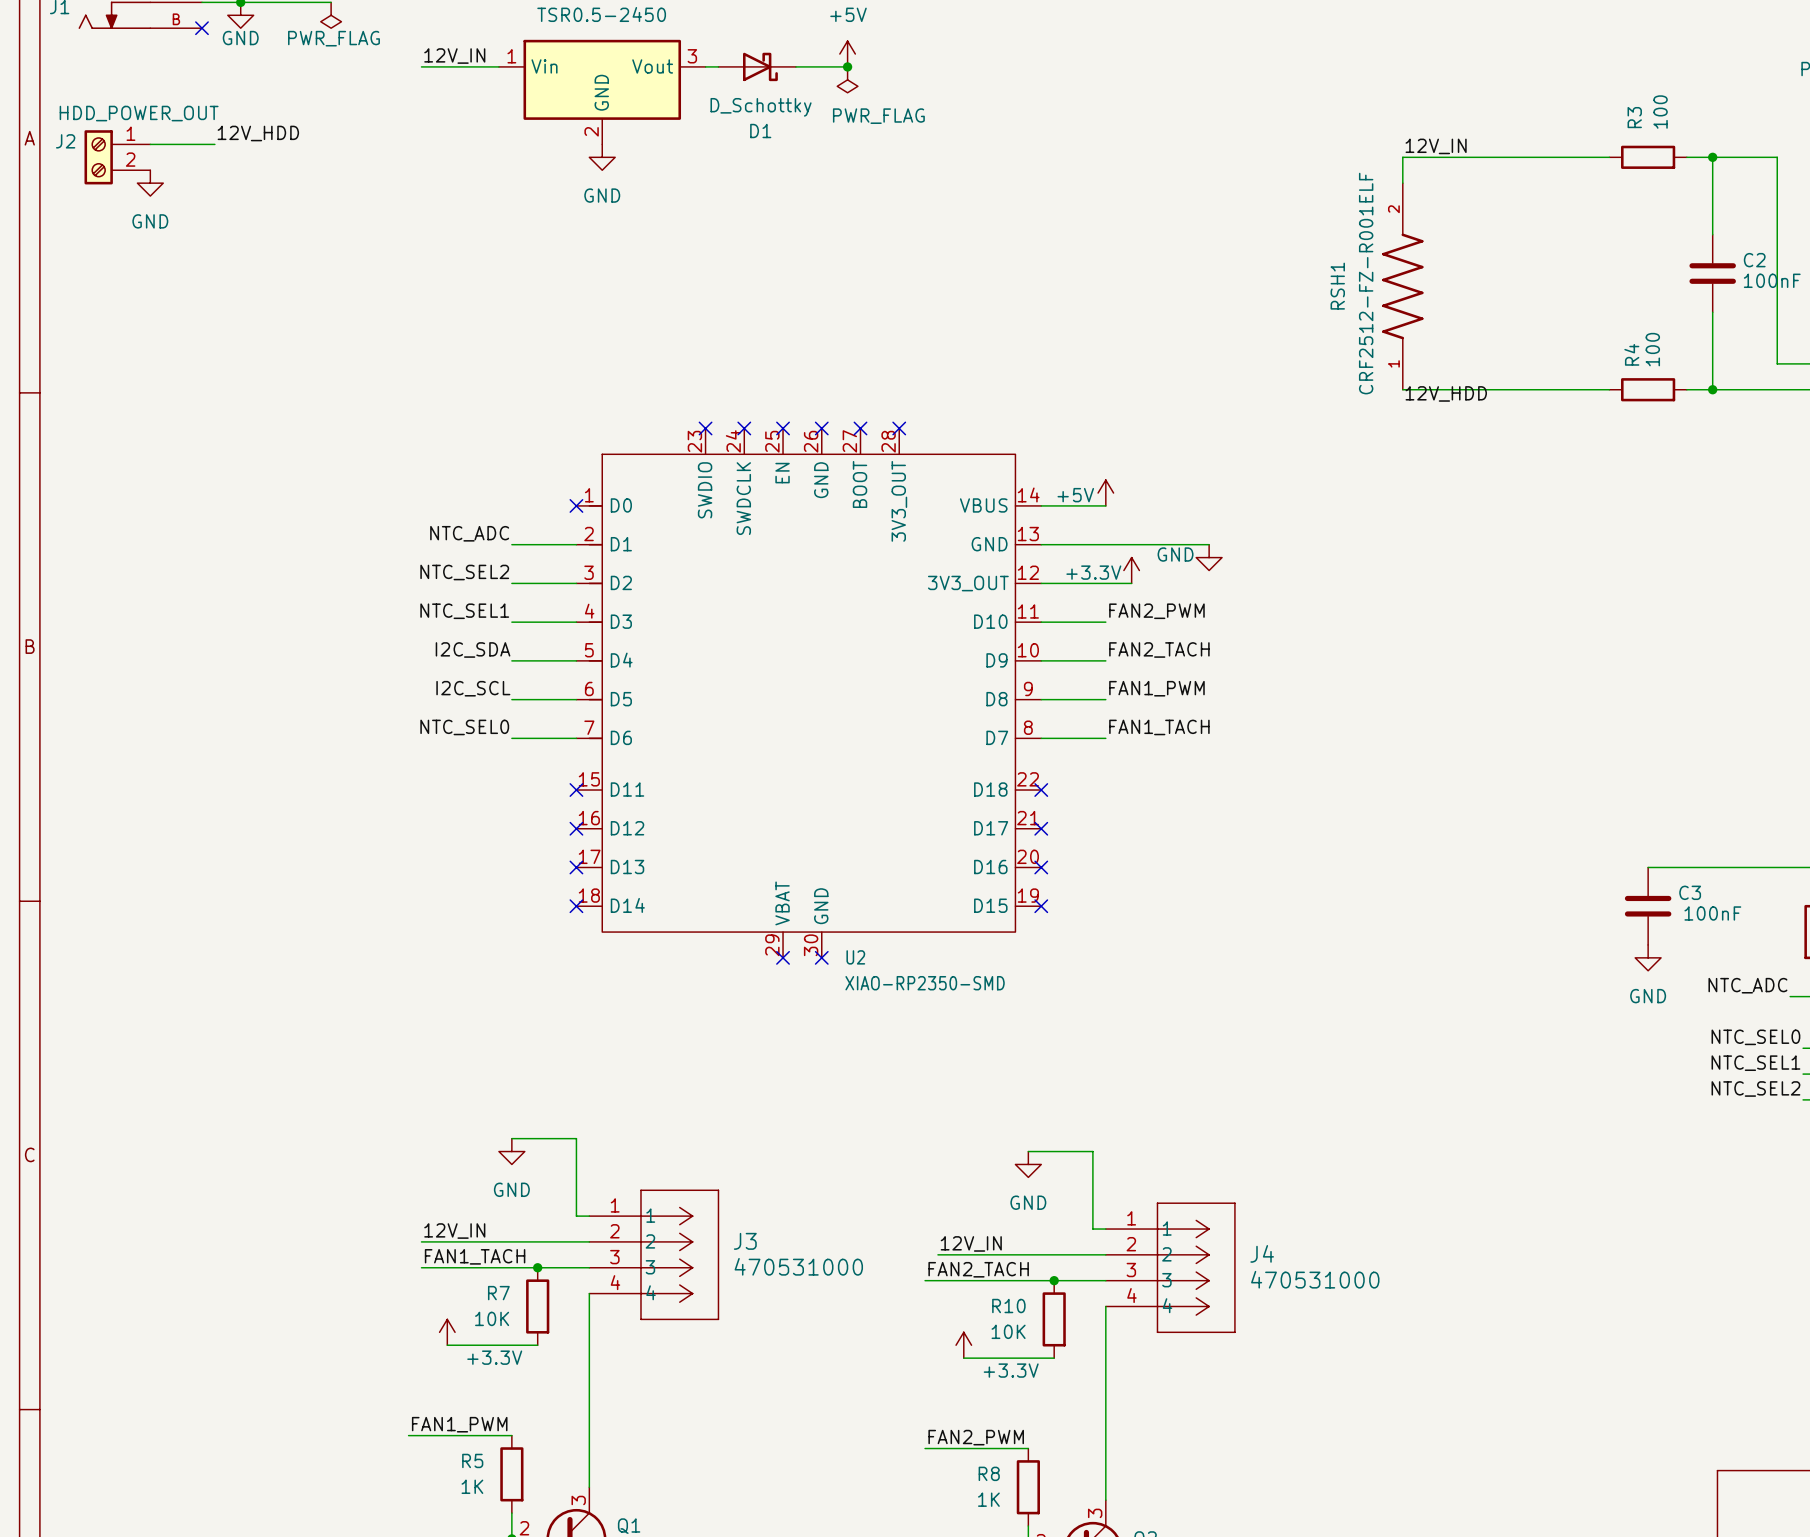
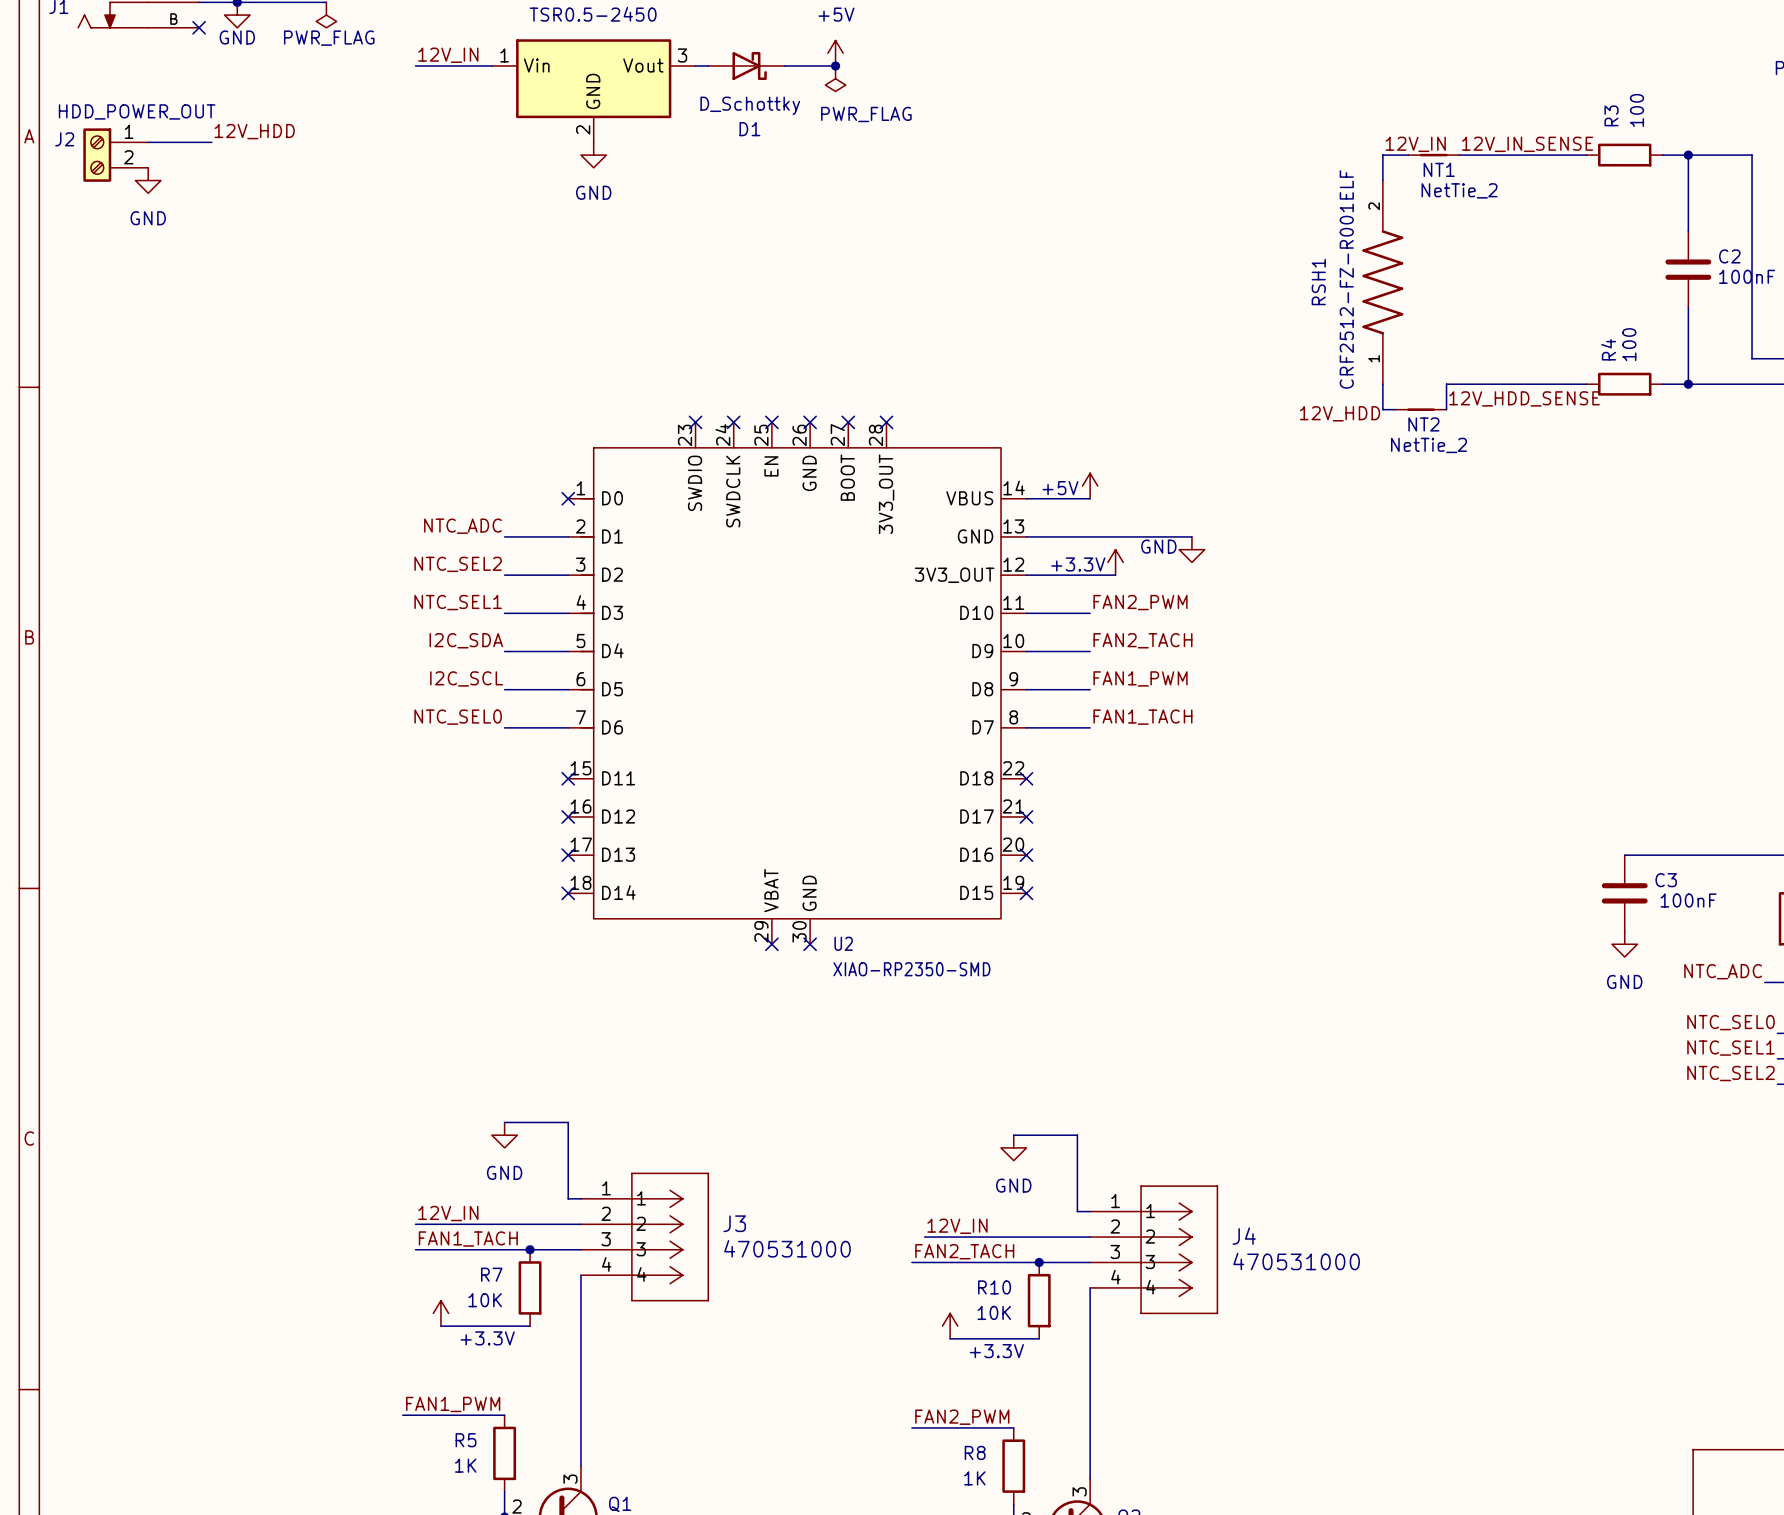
label: none -> 12V_IN_SENSE (1527, 144)
NT1: none -> NetTie_2 (1433, 155)
wire: (1402, 389) (1467, 389) -> (1382, 384) (1382, 409) (1395, 409)
wire: none -> (1446, 384) (1446, 409)
label position: 12V_HDD (1446, 393) -> 12V_HDD (1340, 413)
label: none -> 12V_HDD_SENSE (1524, 398)
NT2: none -> NetTie_2 (1421, 409)

